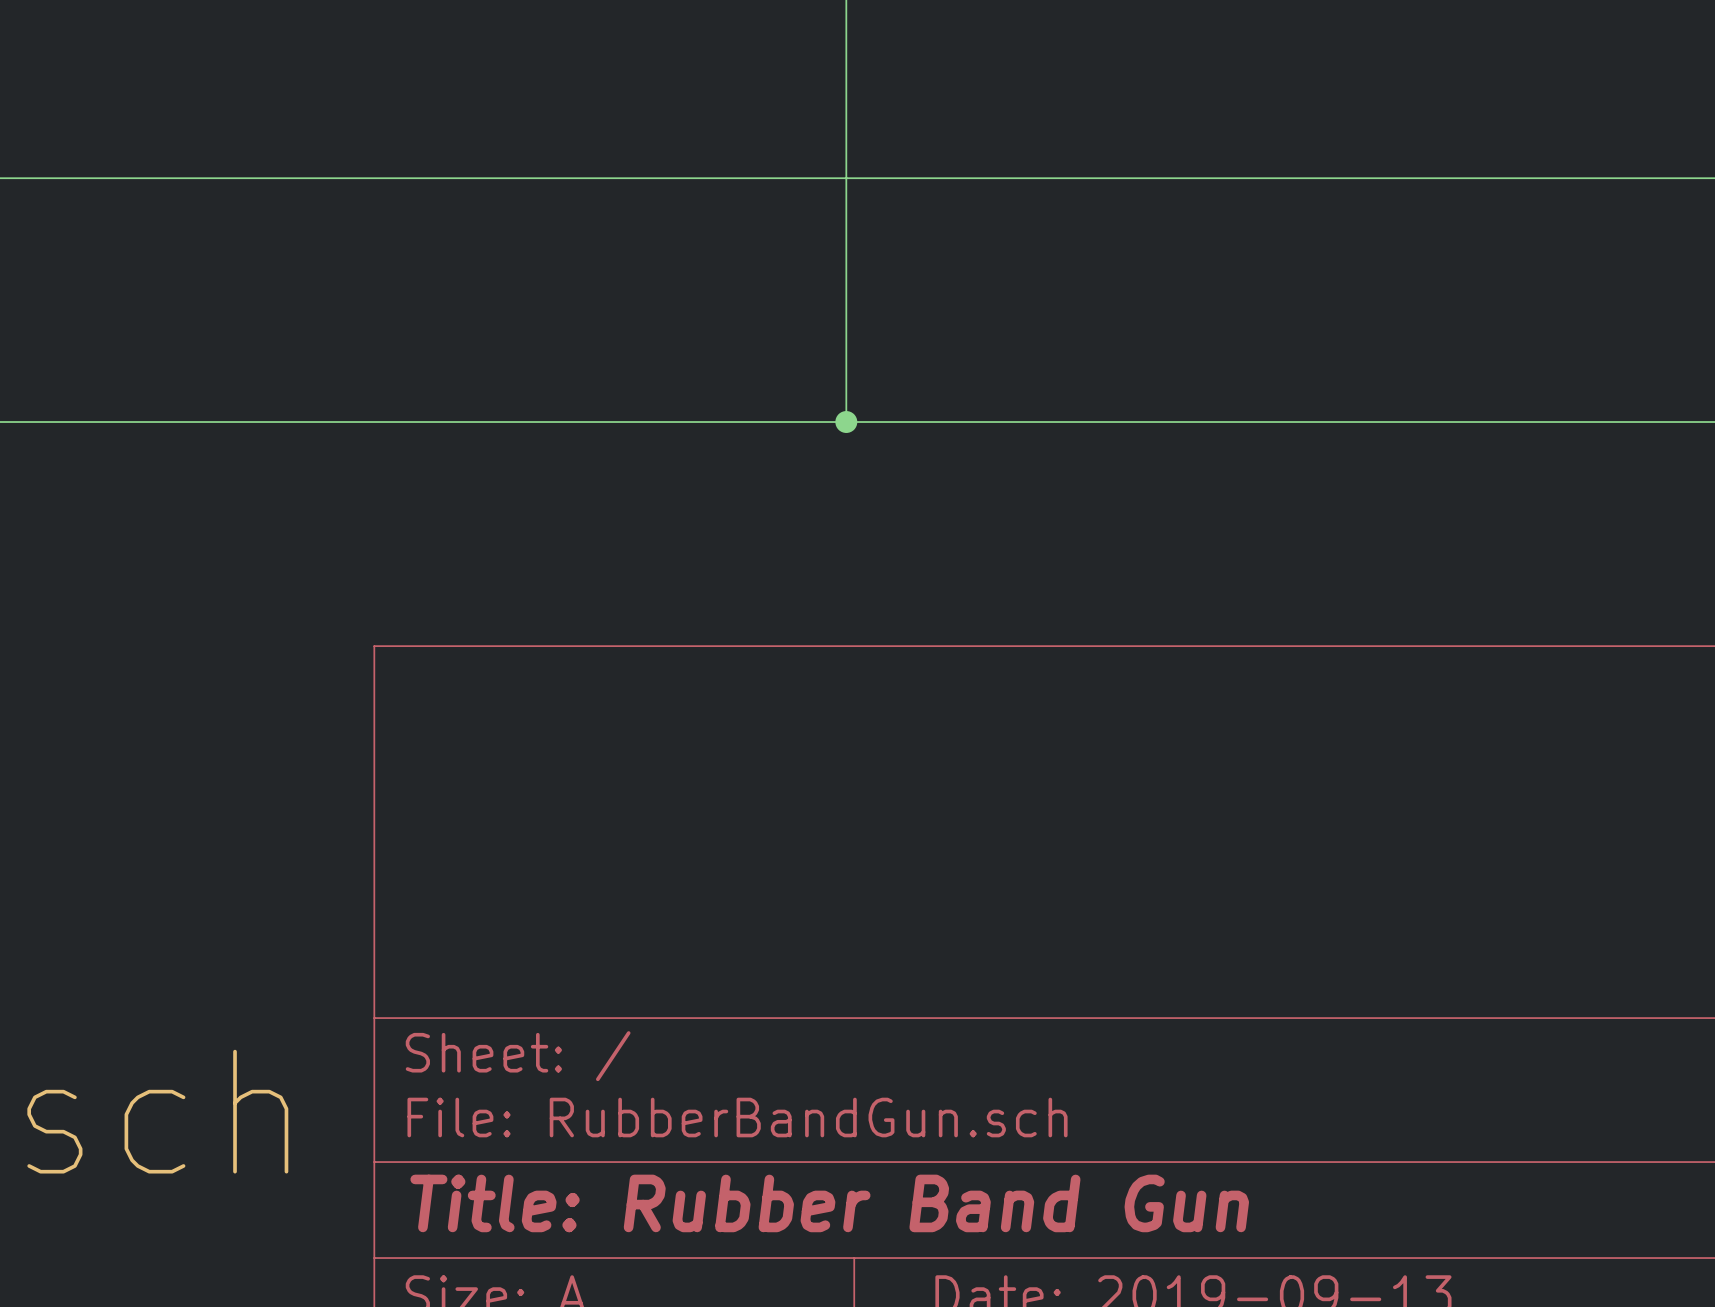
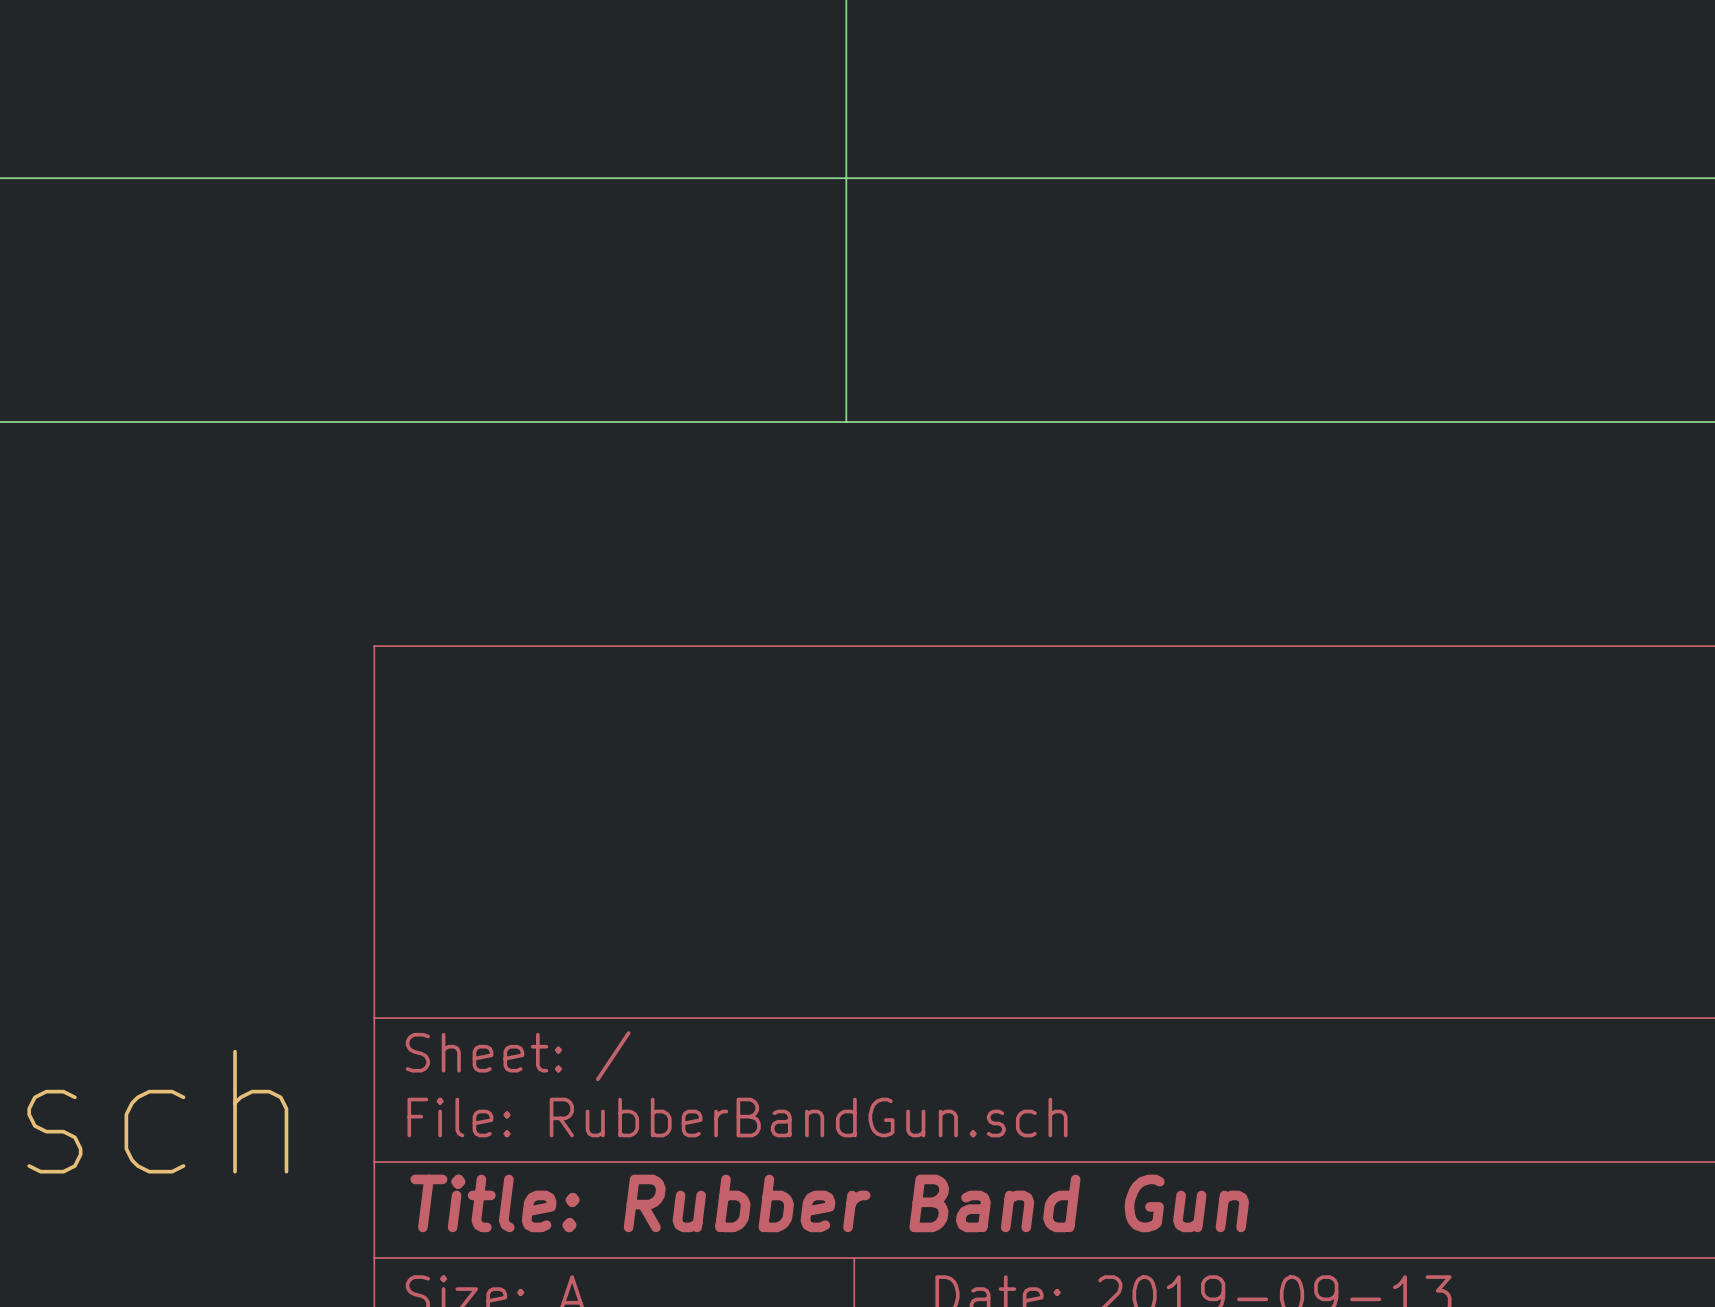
junction: (846, 422) -> none

